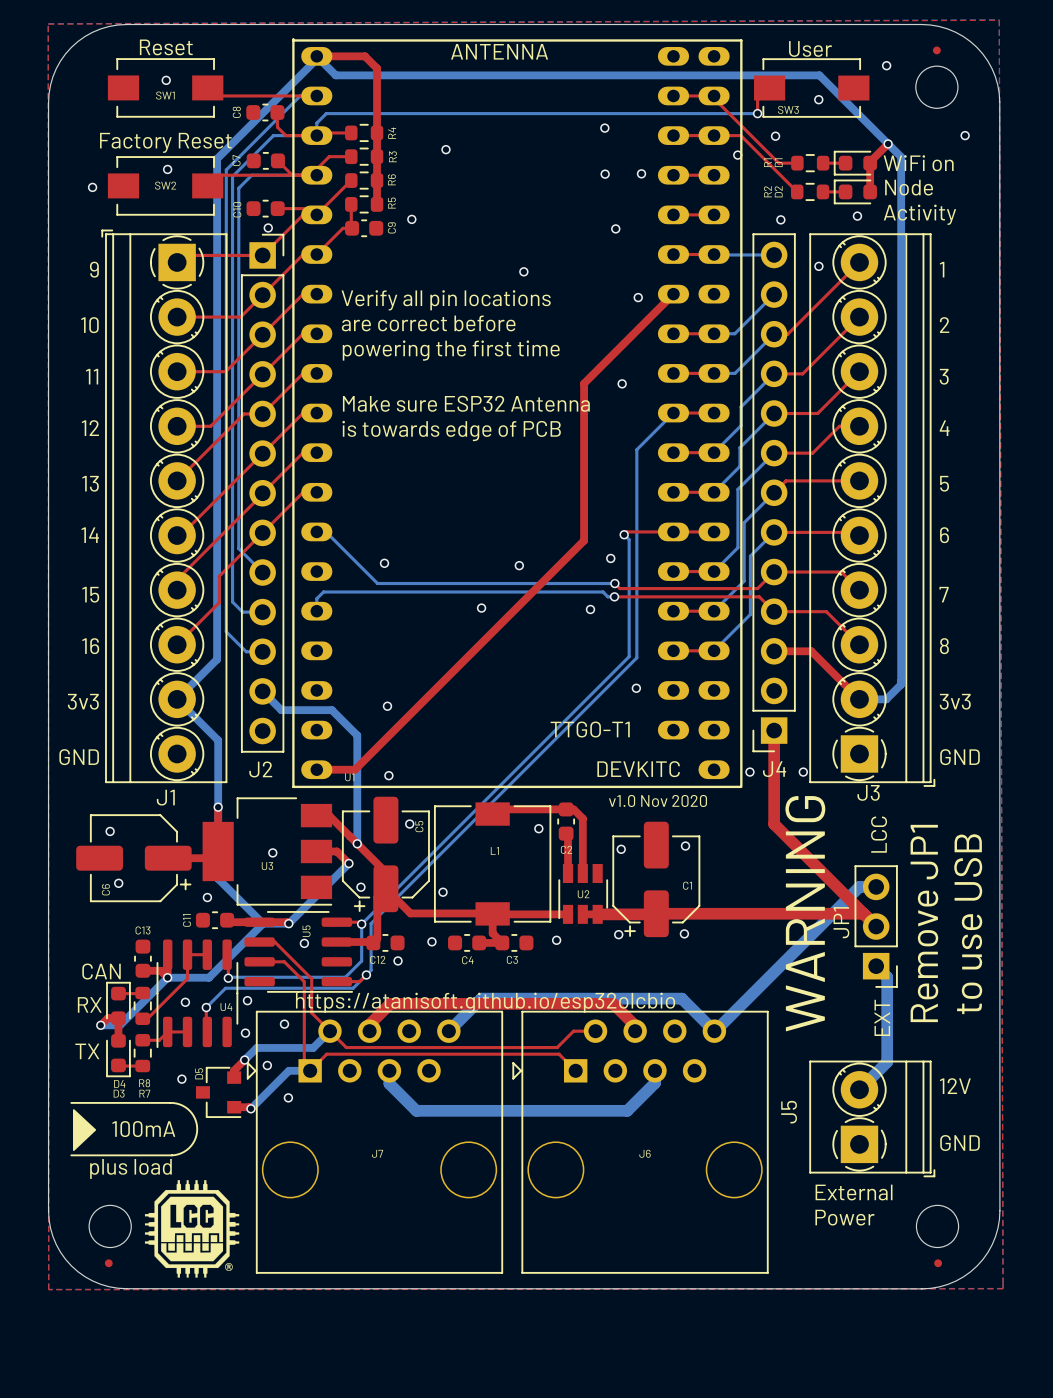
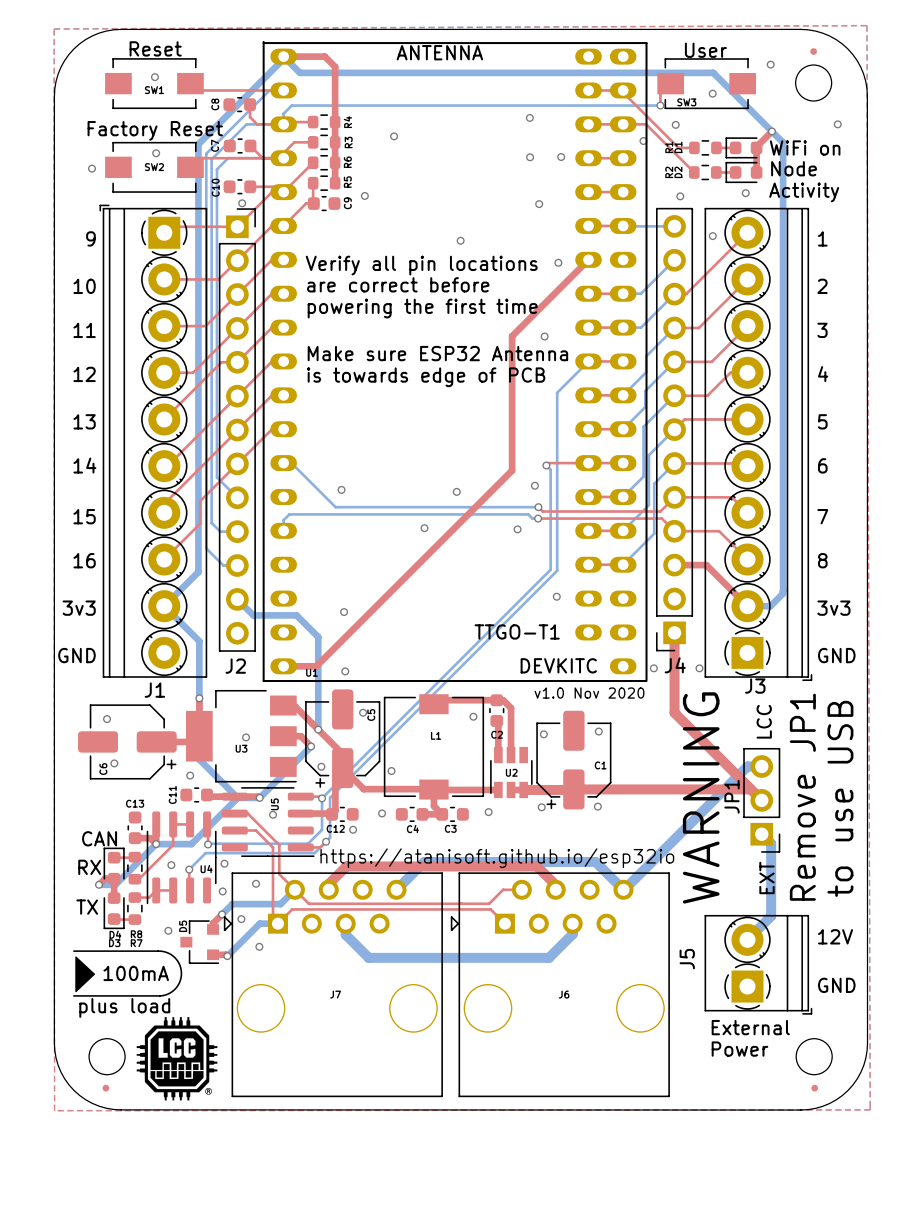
text: https://atanisoft.github.io/esp32olcbio (485, 1002) -> https://atanisoft.github.io/esp32io (497, 858)

